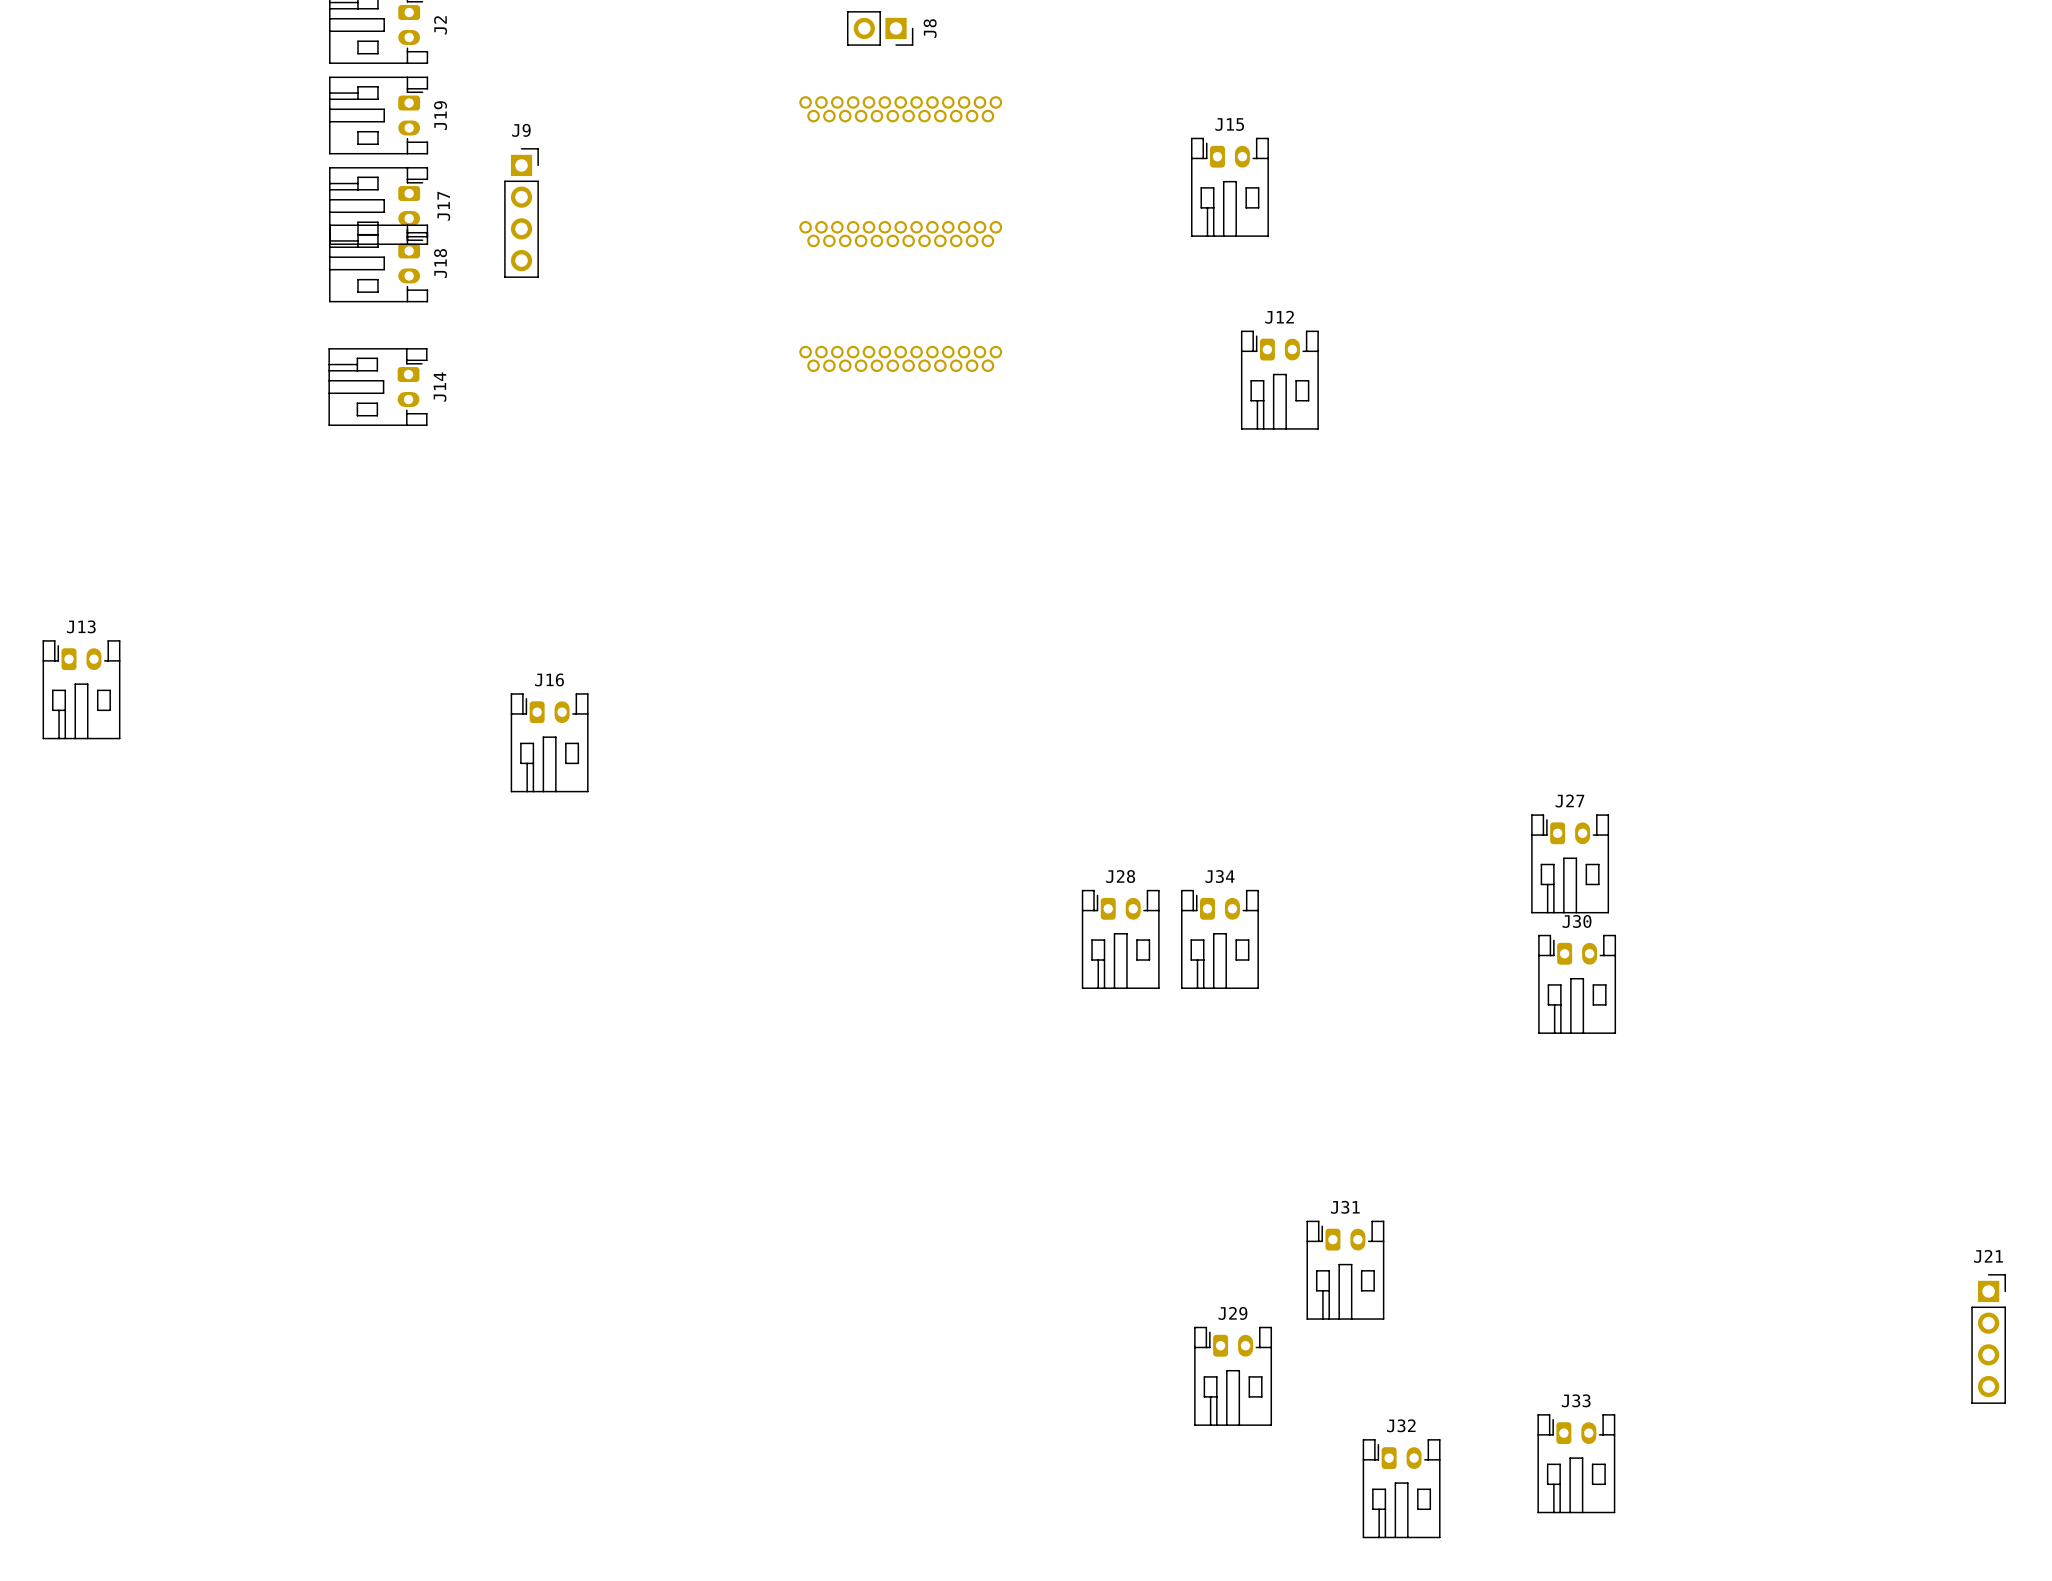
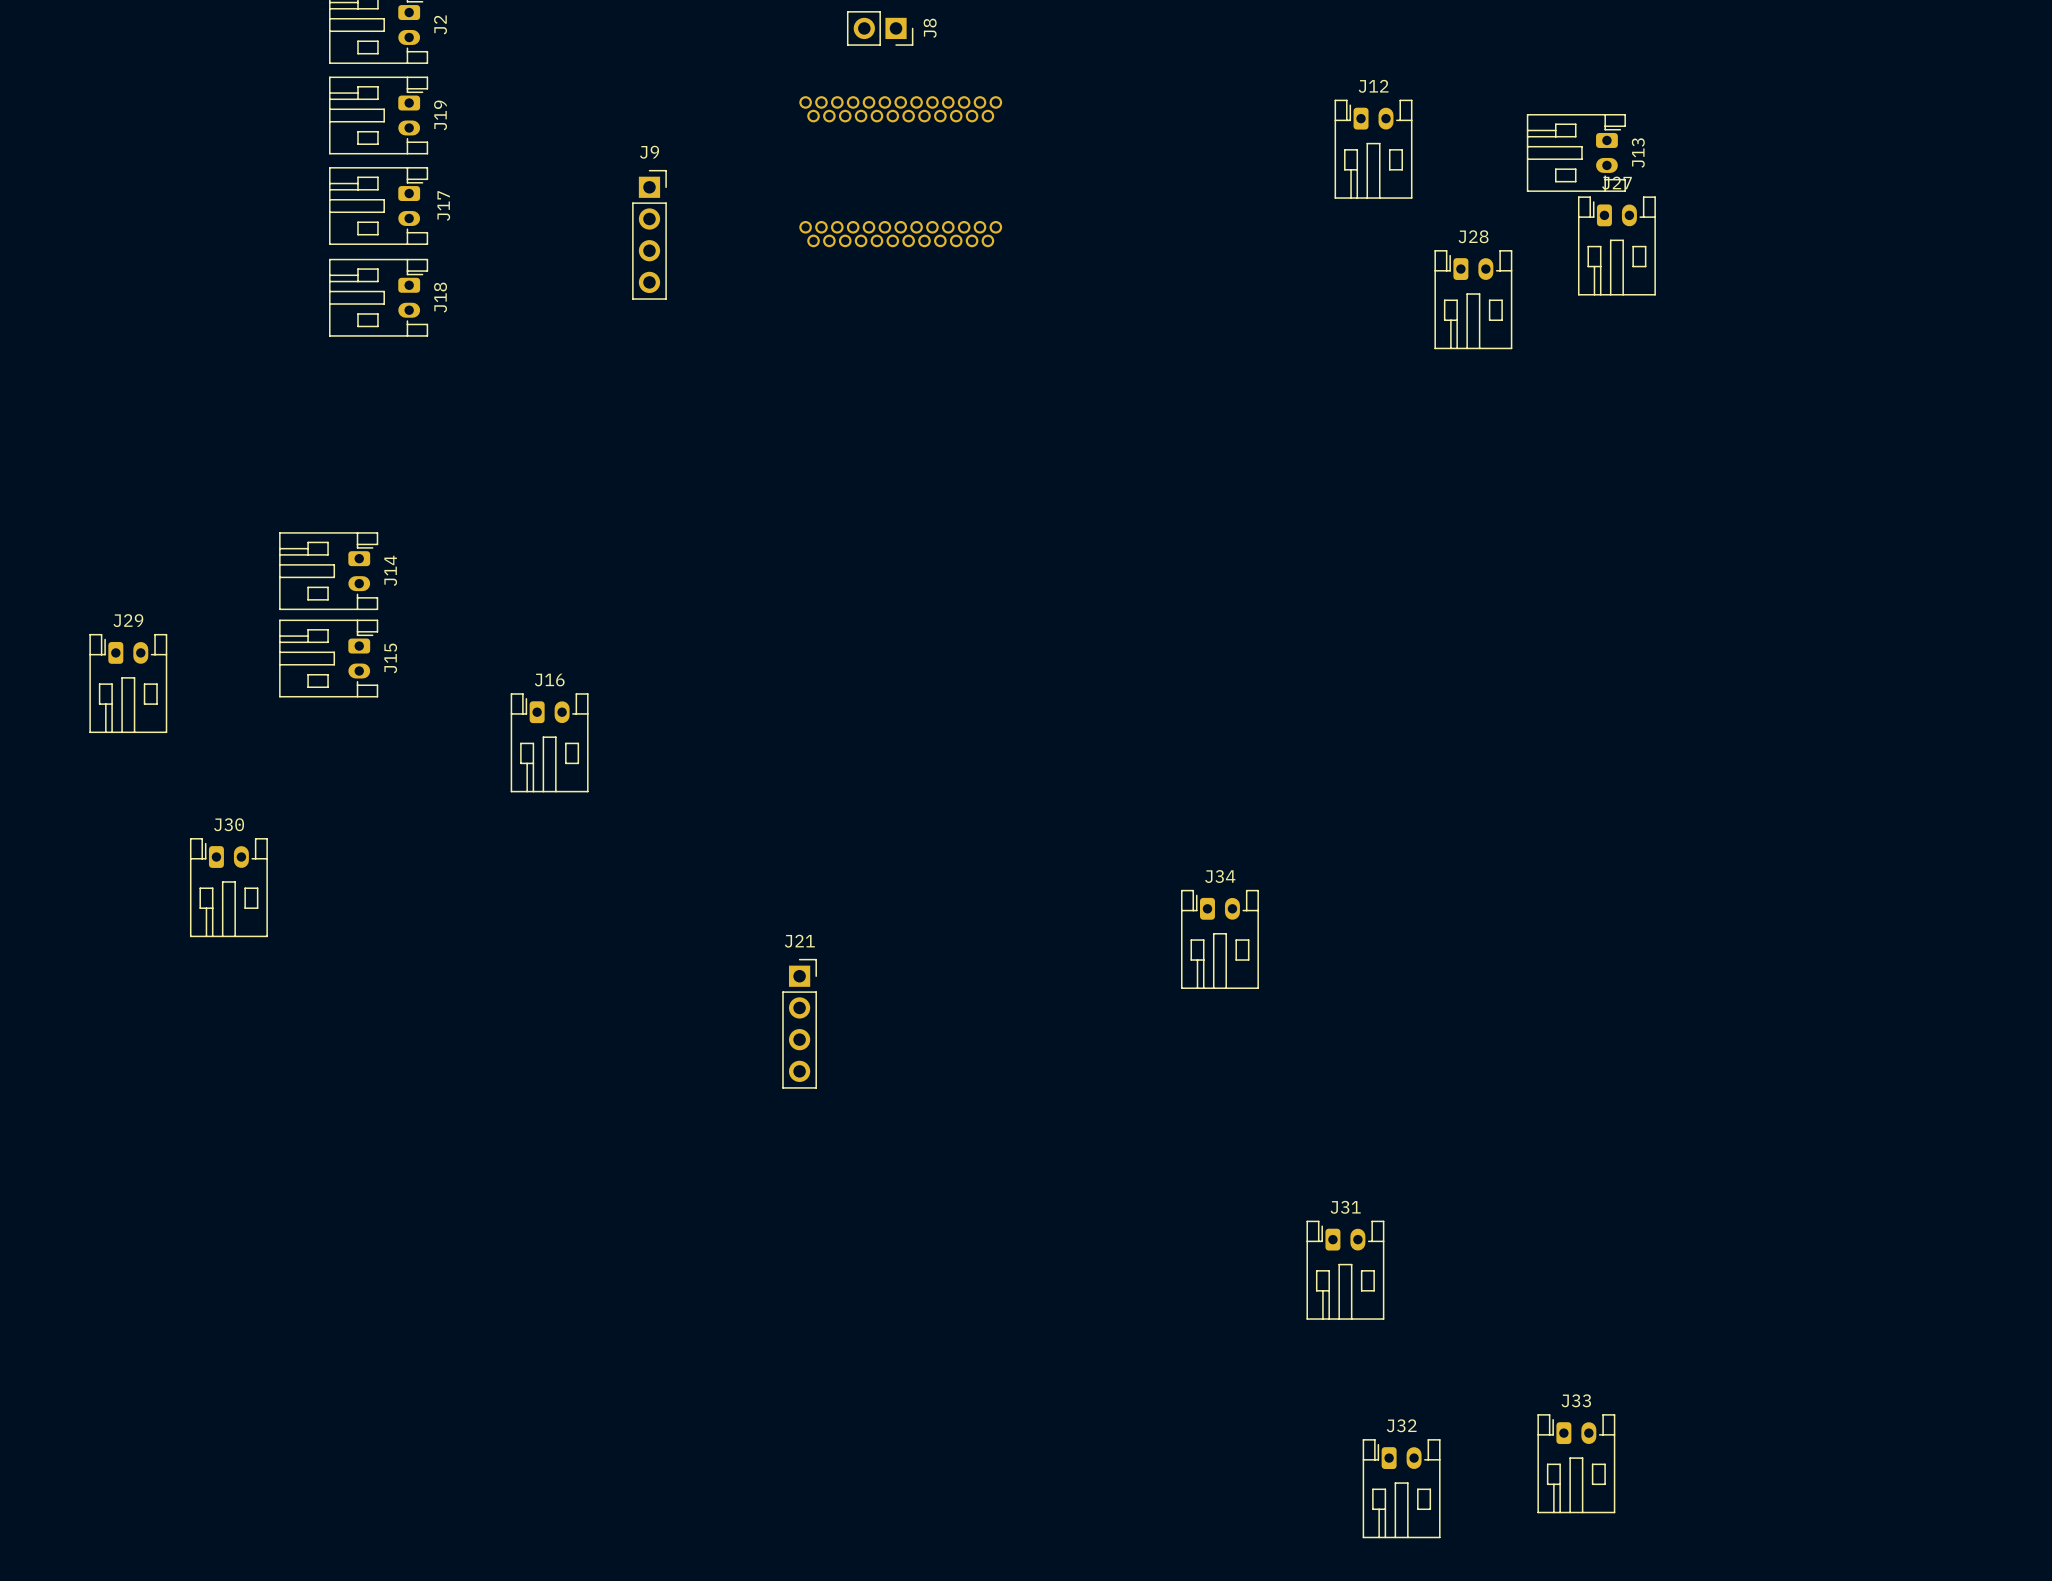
J15 rotation: 0° (1229, 187) -> 90° clockwise (328, 658)
J15 position: (1229, 187) -> (328, 658)
J9 position: (521, 213) -> (649, 234)
J18 position: (378, 263) -> (378, 297)
part: (900, 358) -> none
J12 position: (1279, 380) -> (1373, 149)
J14 position: (377, 387) -> (328, 571)
J13 rotation: 0° (81, 689) -> 90° clockwise (1576, 152)
J13 position: (81, 689) -> (1576, 152)
J27 position: (1570, 863) -> (1616, 245)
J28 position: (1120, 939) -> (1473, 299)
J30 position: (1577, 984) -> (228, 887)
J21 position: (1988, 1338) -> (799, 1023)
J29 position: (1233, 1376) -> (128, 683)

